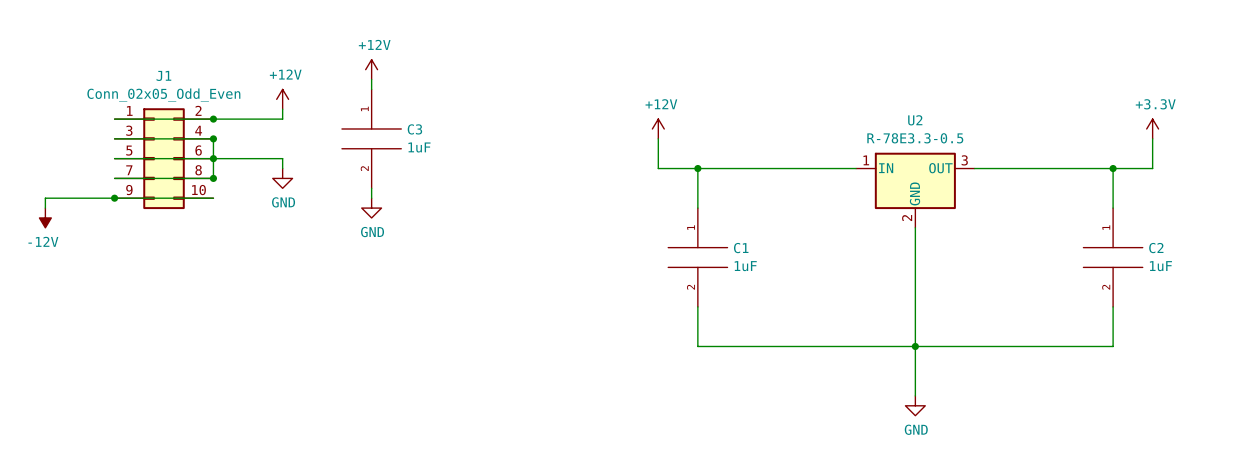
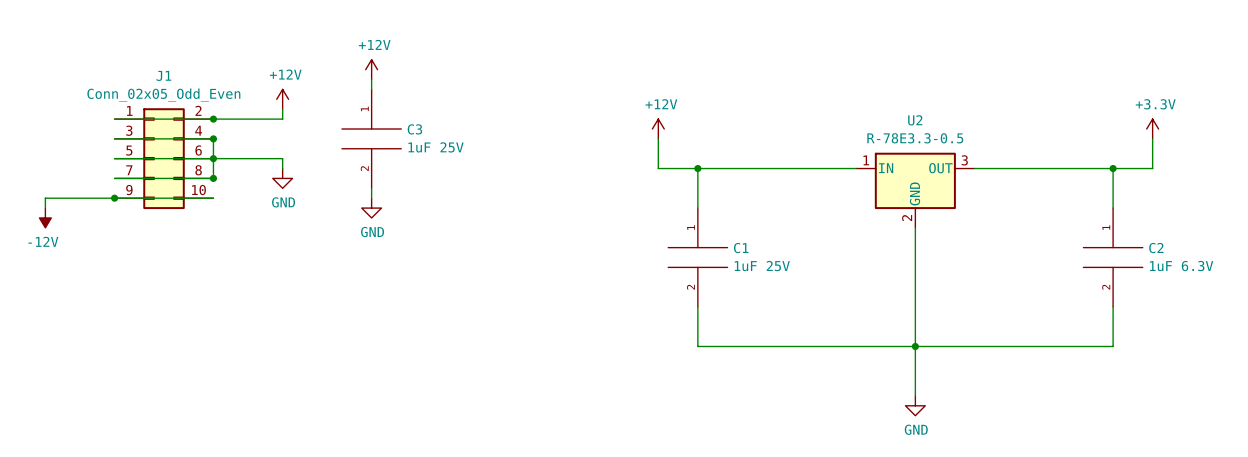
C3 value: 1uF (419, 147) -> 1uF 25V (436, 147)
C1 value: 1uF (745, 266) -> 1uF 25V (762, 266)
C2 value: 1uF (1160, 266) -> 1uF 6.3V (1181, 266)

